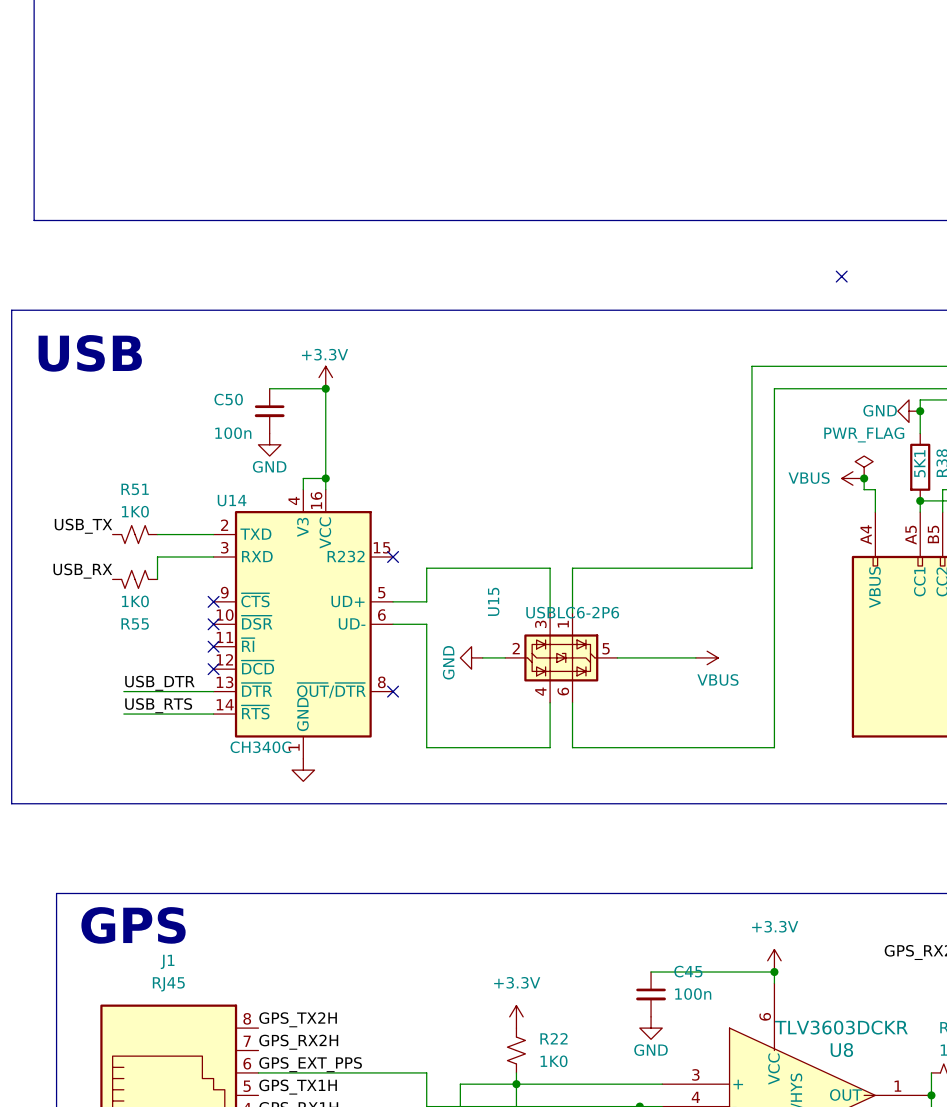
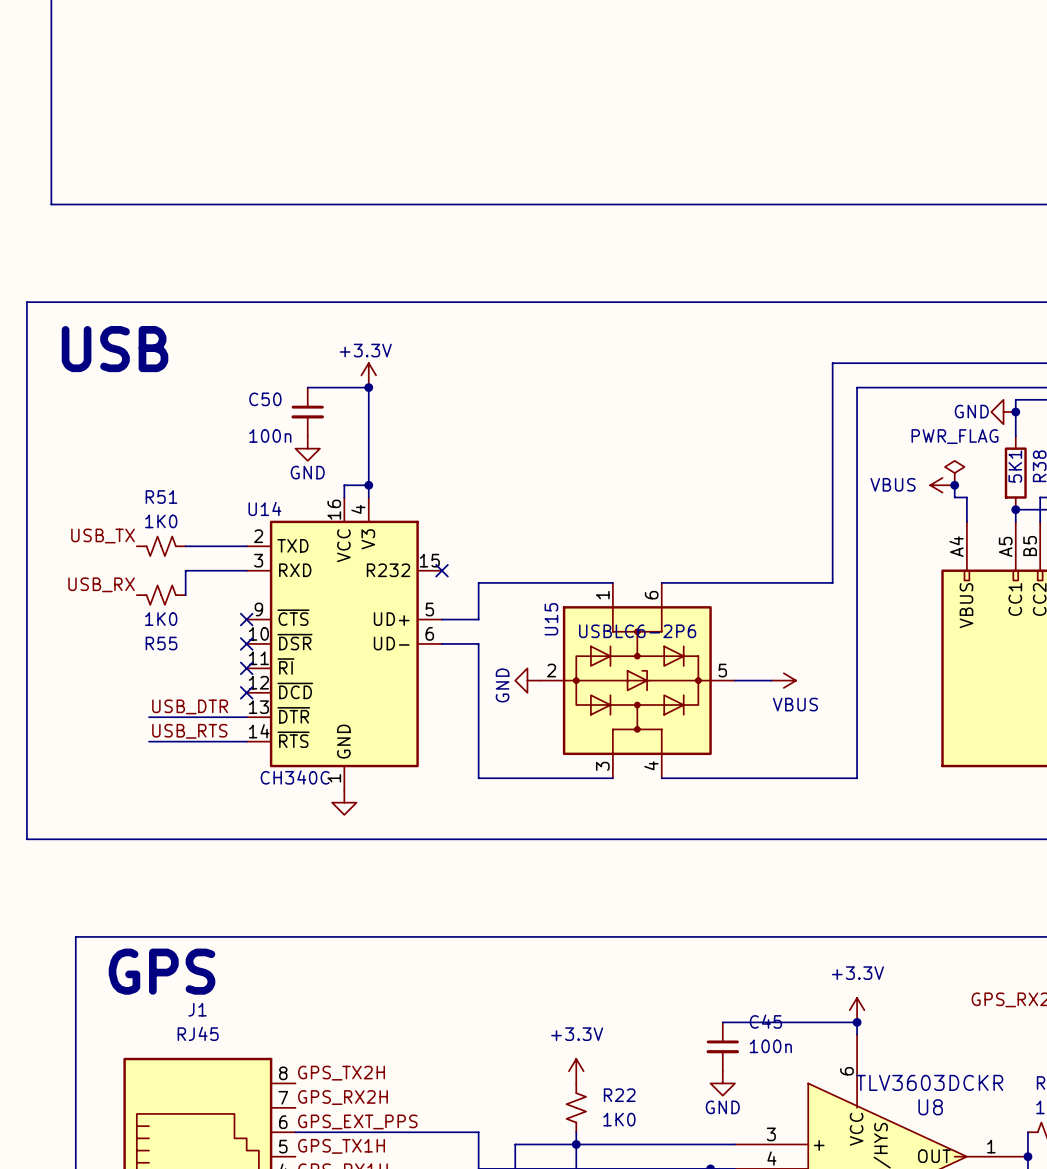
no-connect mark: (841, 276) -> none
U14 symbol: [213, 489, 394, 759] -> [246, 497, 443, 791]
wire: (594, 568) (572, 568) (572, 613) -> none
U15 symbol: [505, 613, 618, 703] -> [539, 582, 735, 779]
no-connect mark: (393, 691) -> none
wire: (572, 702) (572, 747) (594, 747) -> none

